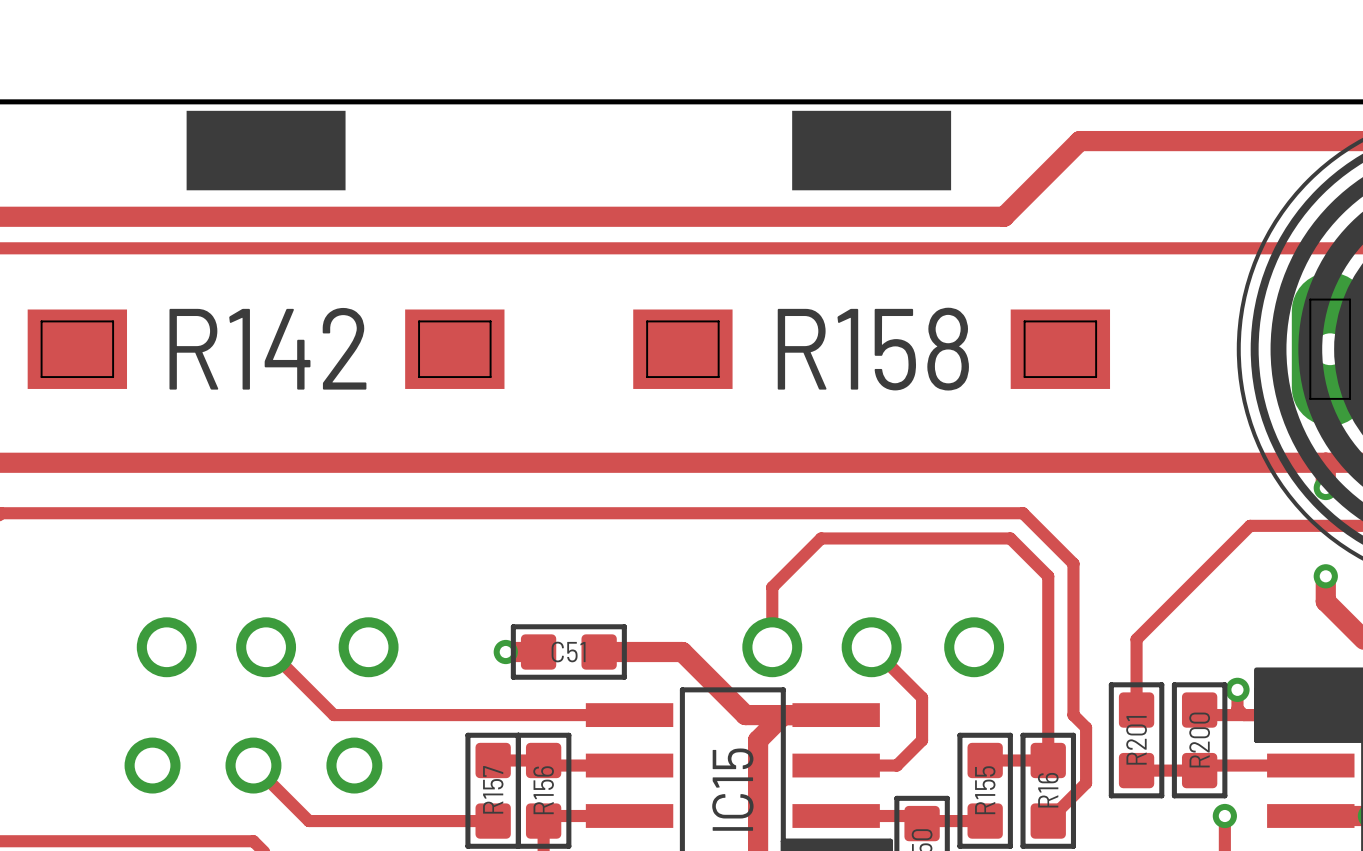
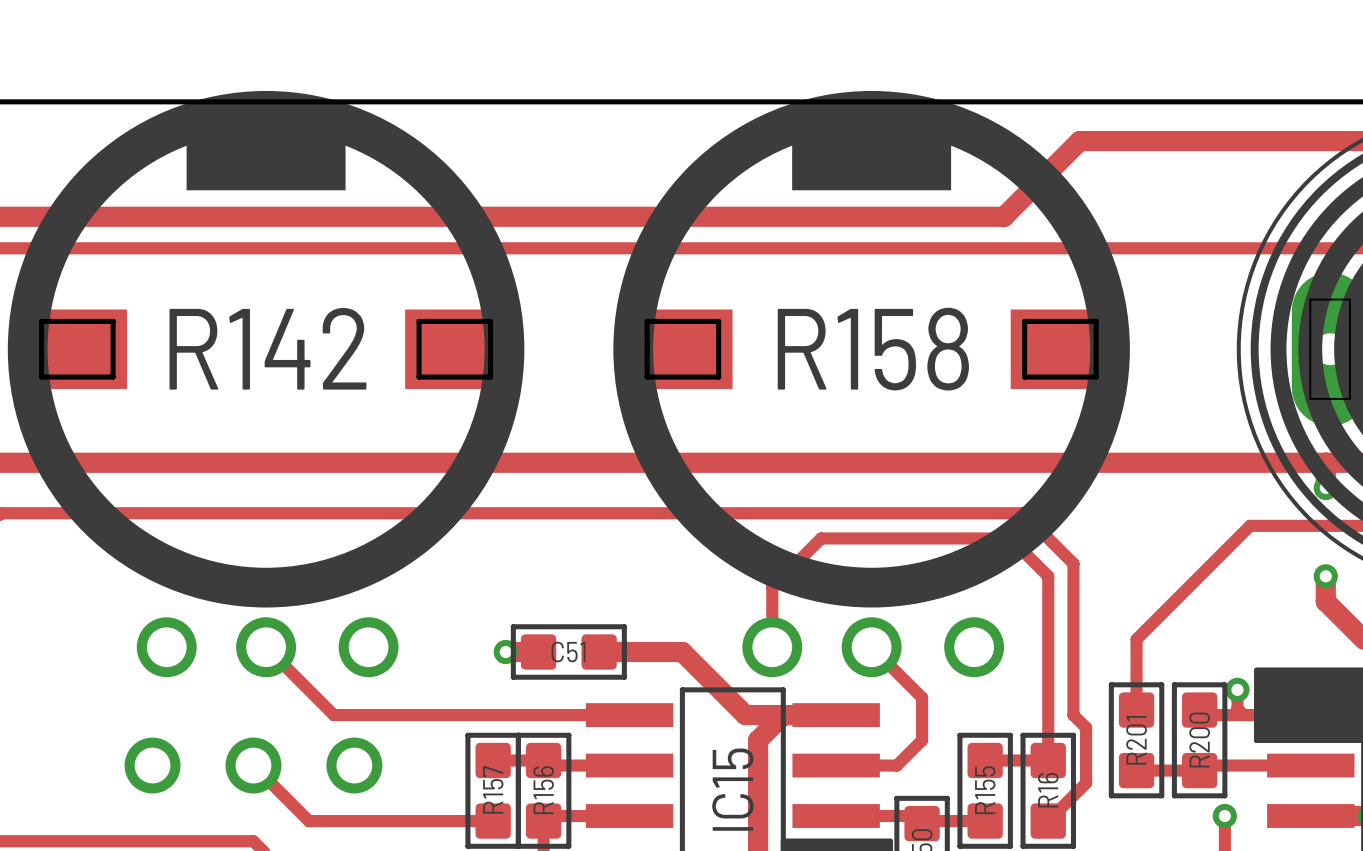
R142 footprint: [27, 110, 505, 678] -> [7, 90, 525, 678]
R158 footprint: [633, 110, 1111, 678] -> [613, 90, 1130, 678]

